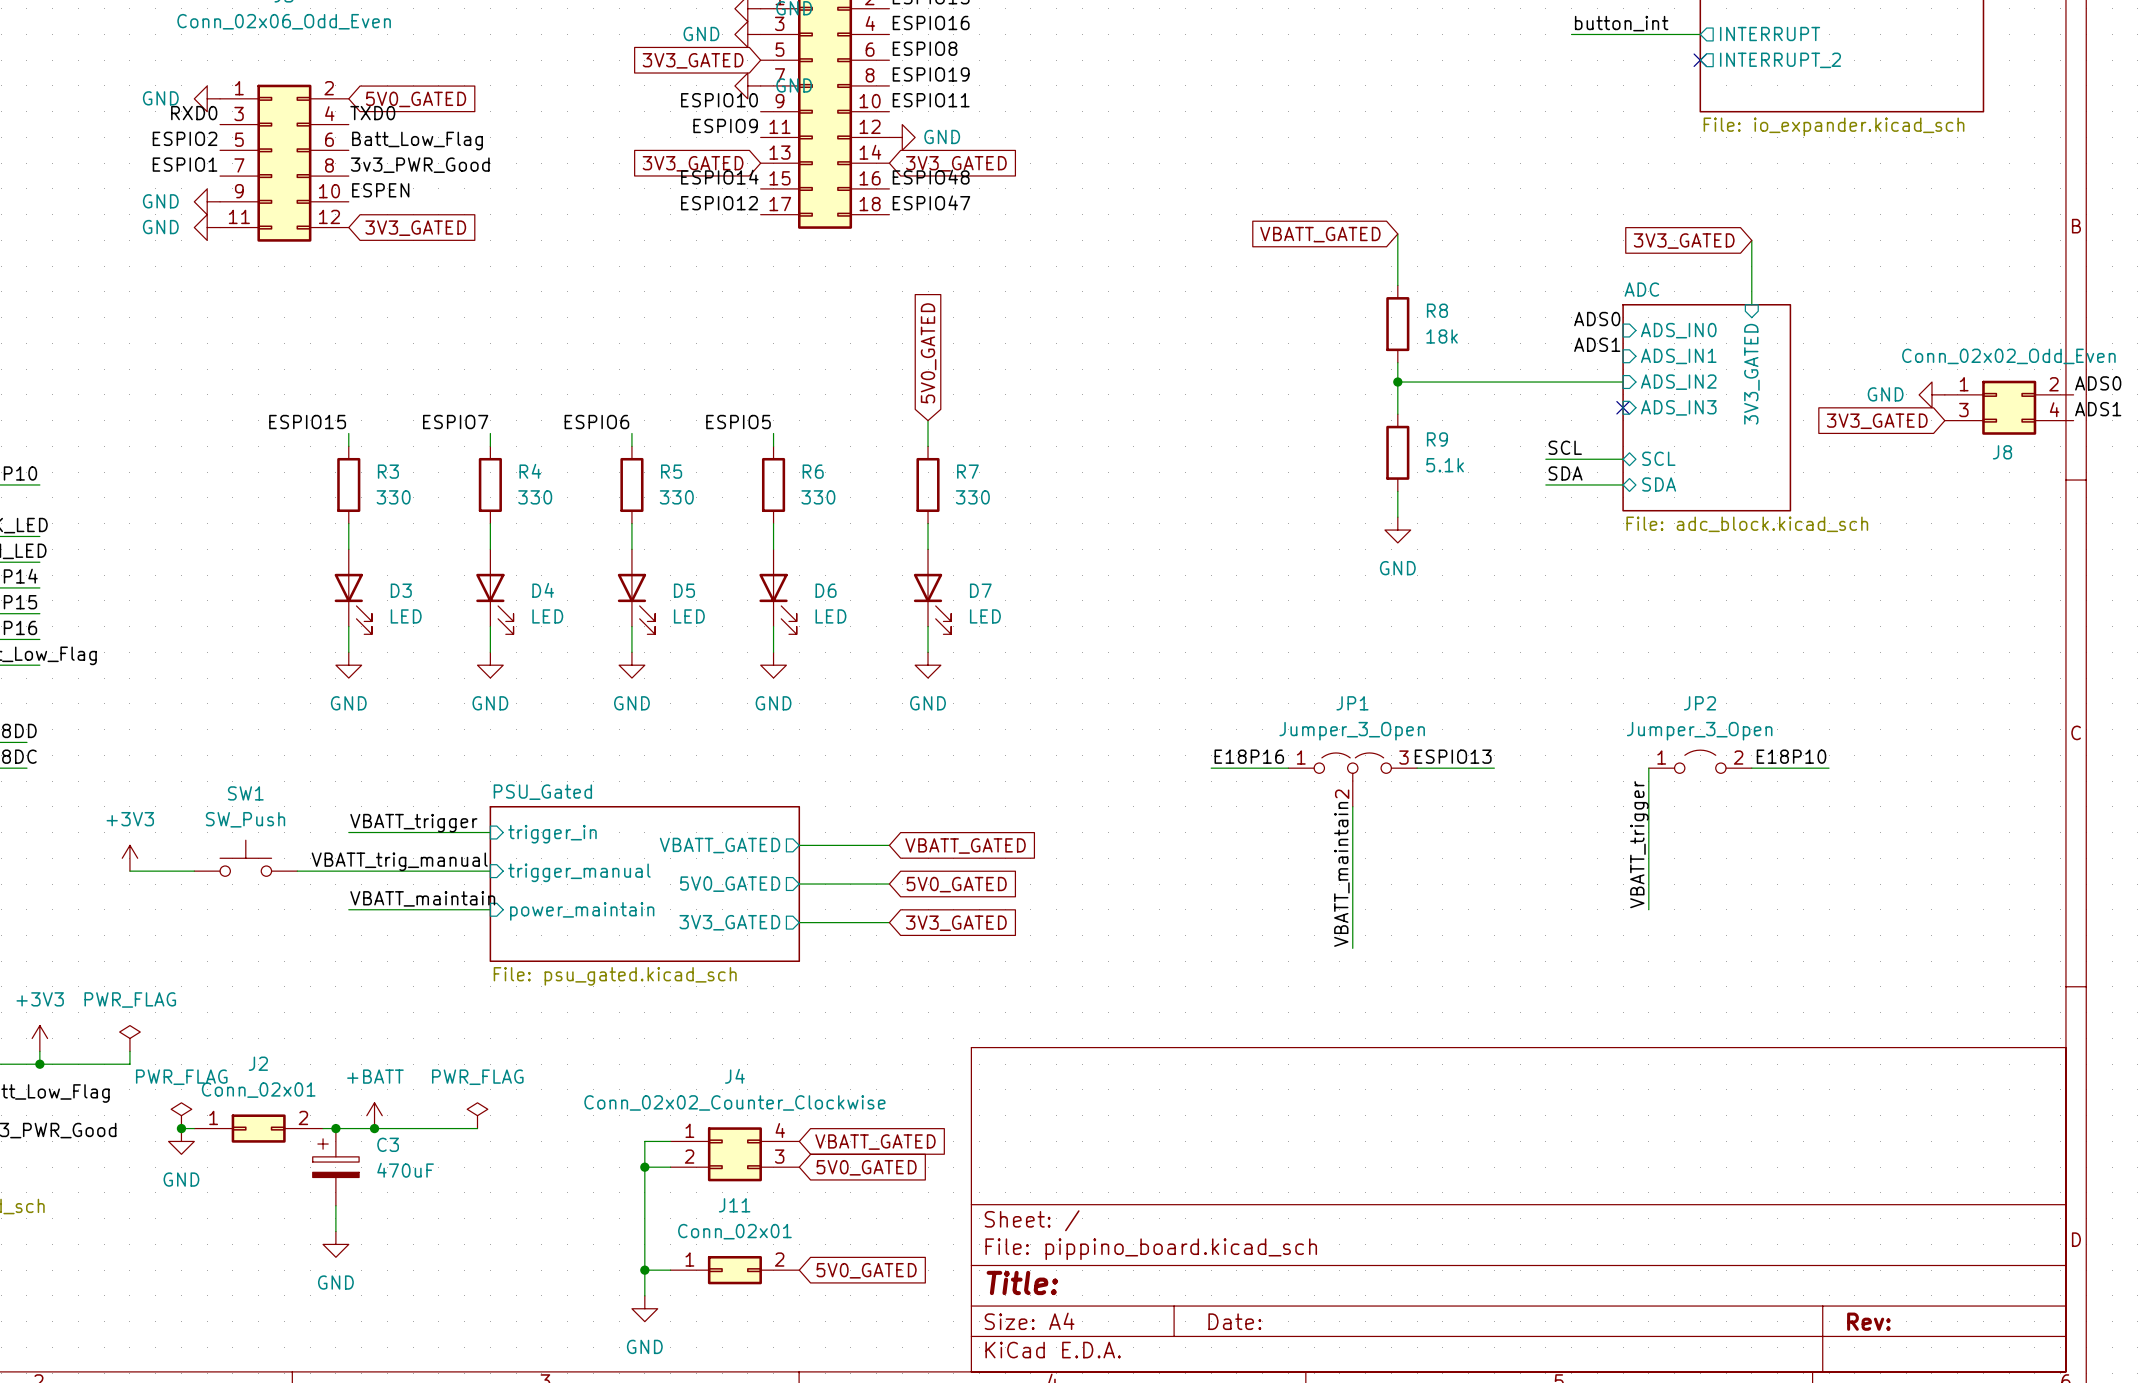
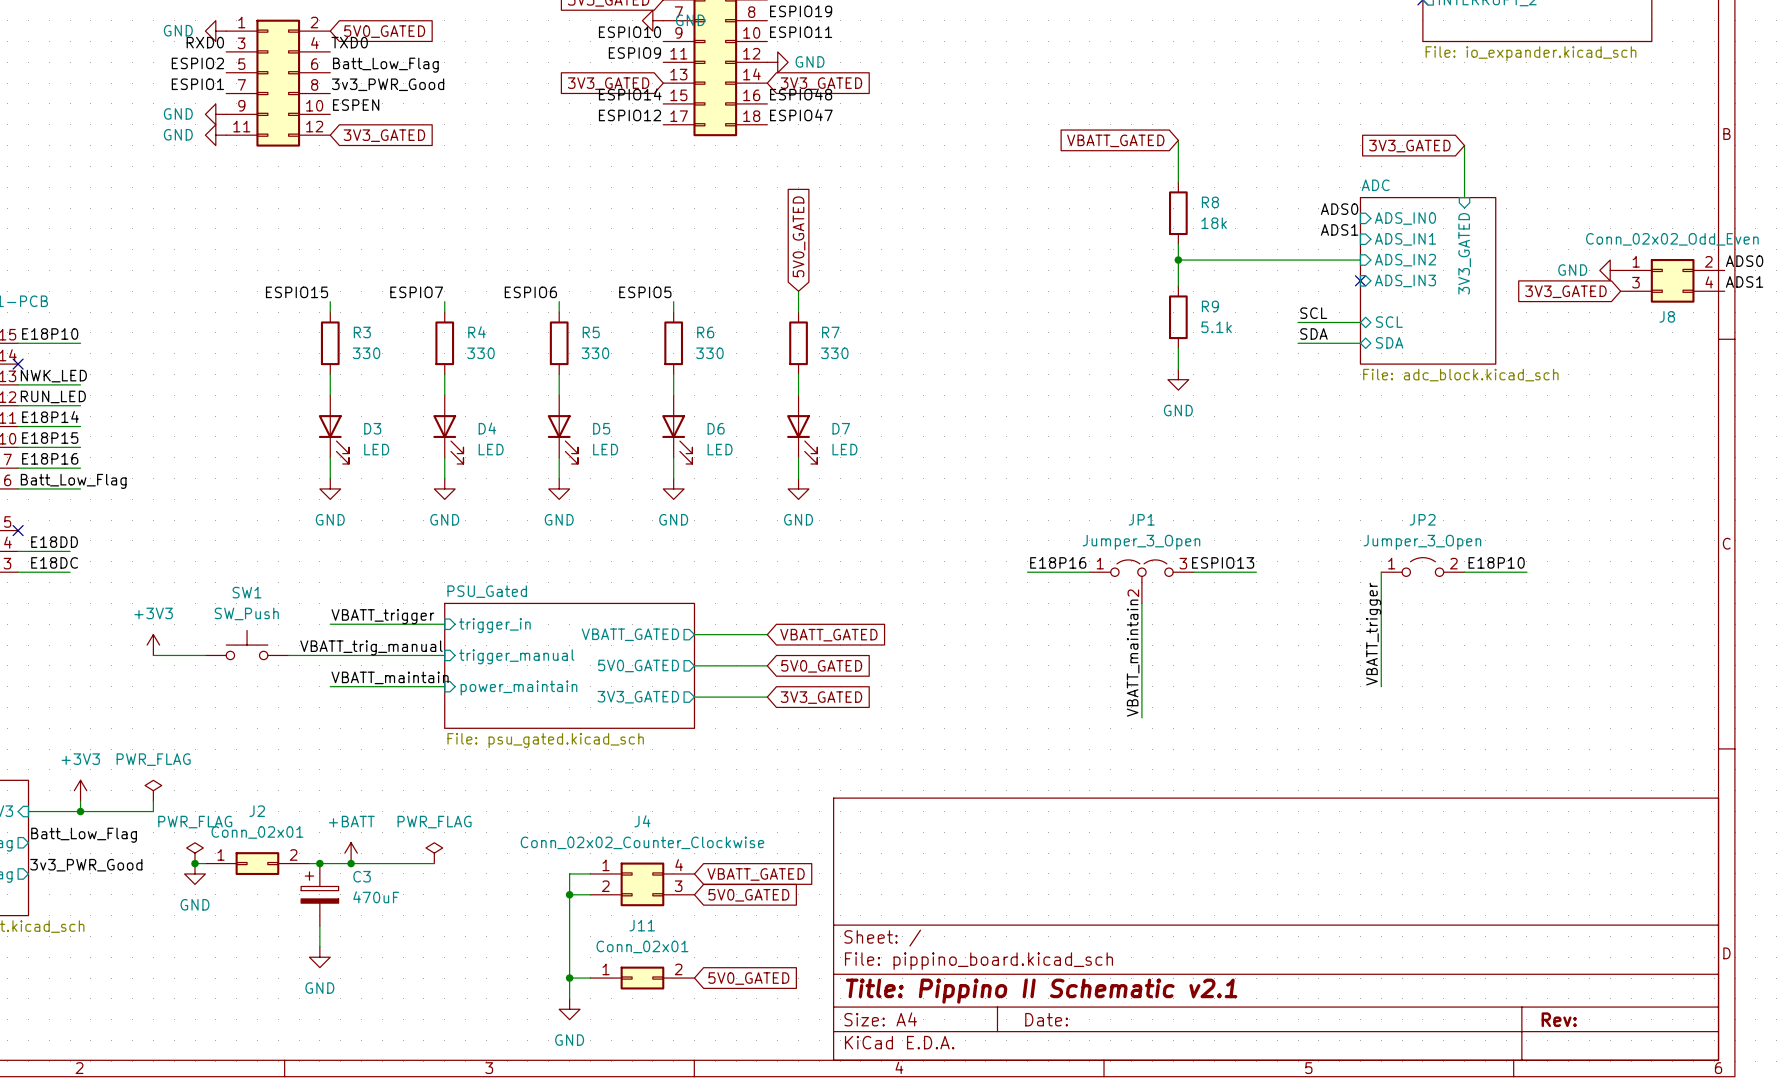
title block: Title: (1022, 1282) -> Title: Pippino II Schematic v2.1 (1041, 991)

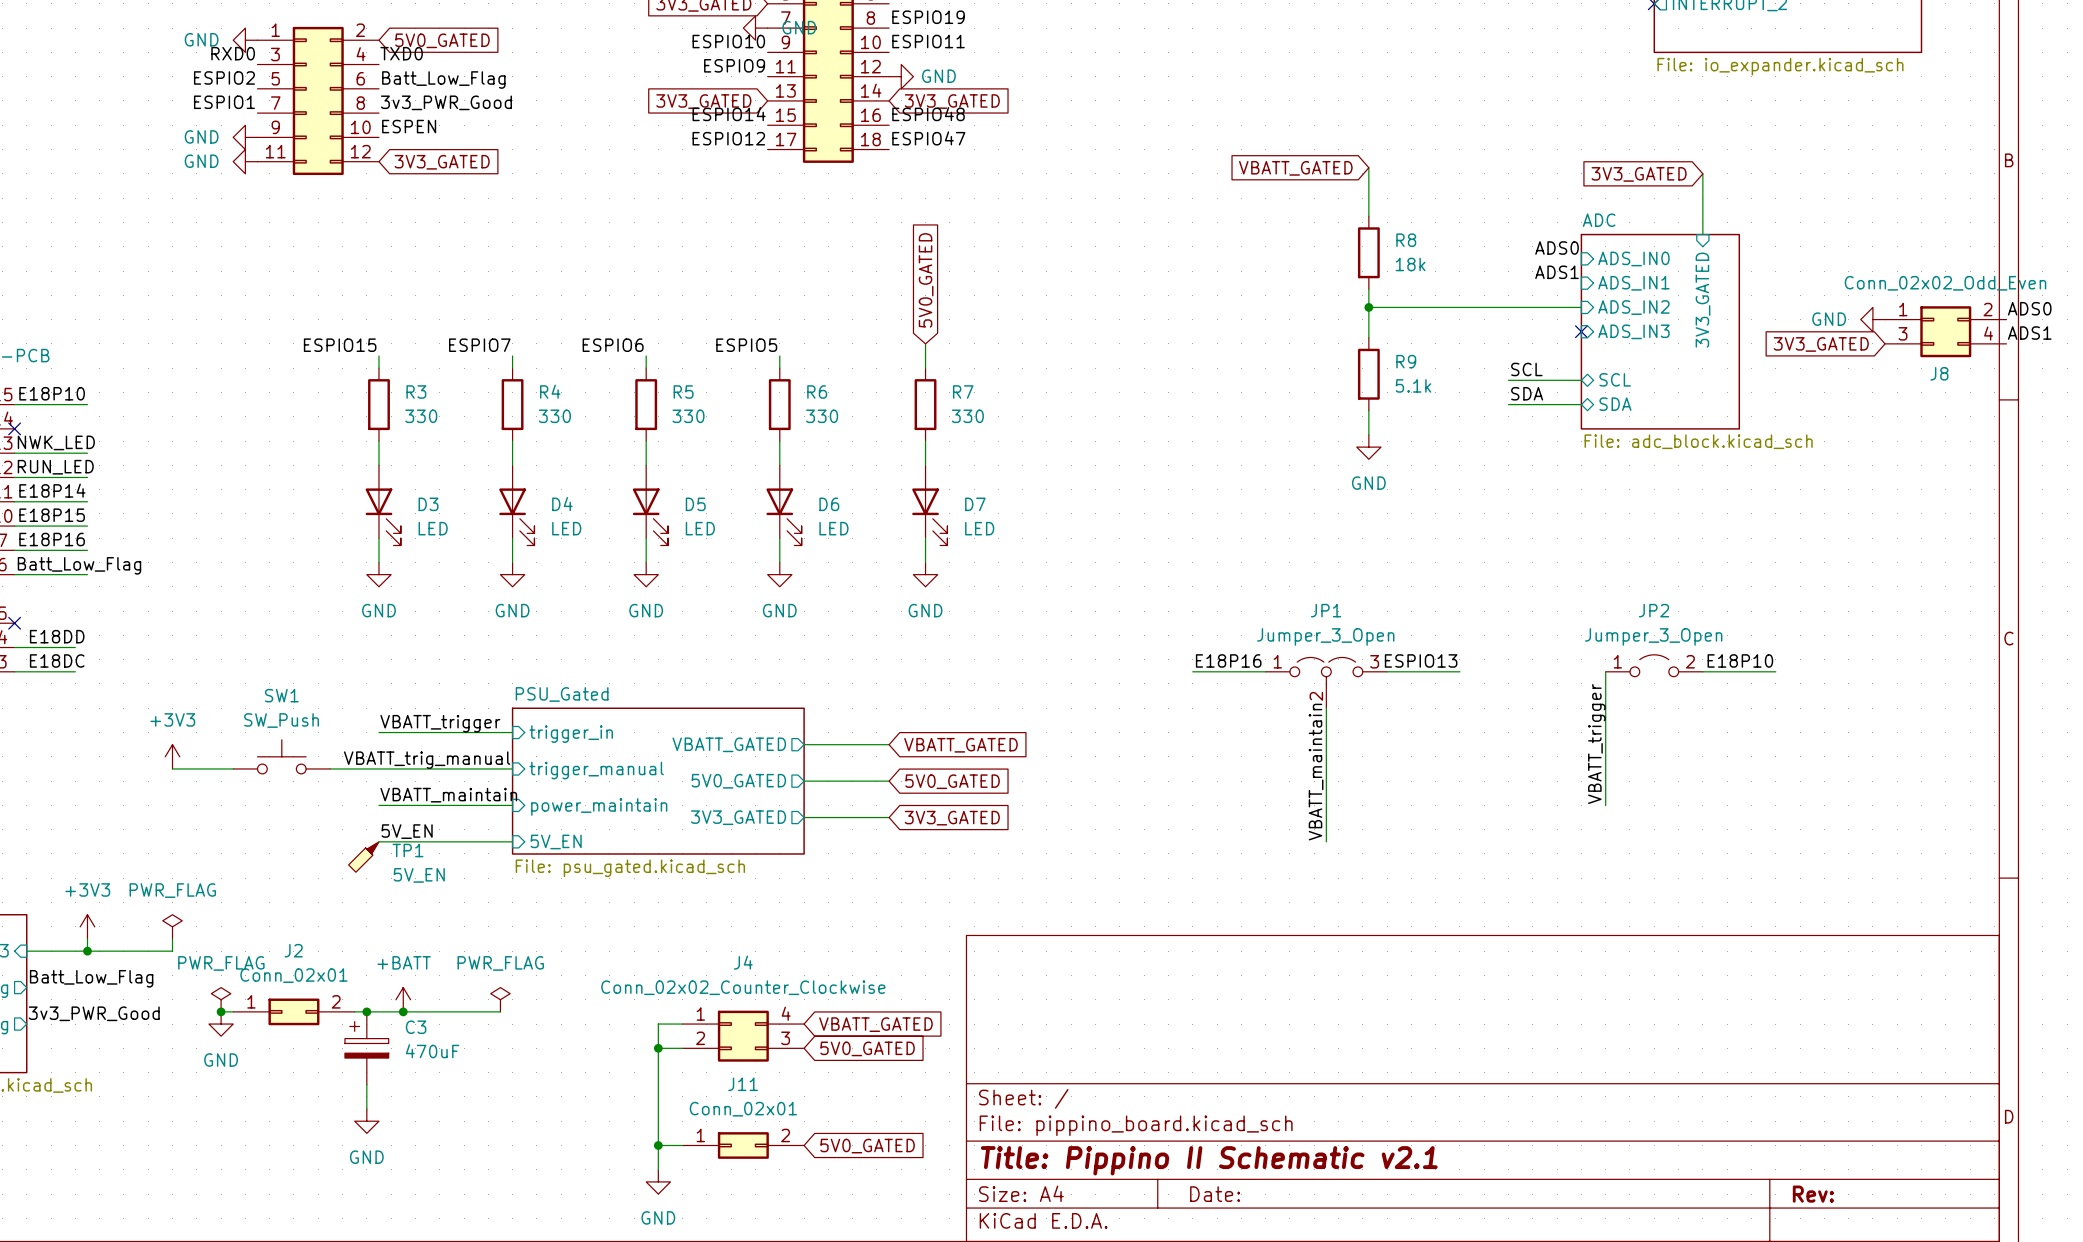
label: none -> 5V_EN (407, 831)
wire: none -> (378, 841) (512, 841)
sheet pin: none -> 5V_EN (556, 841)
TP1: none -> 5V_EN (363, 857)

